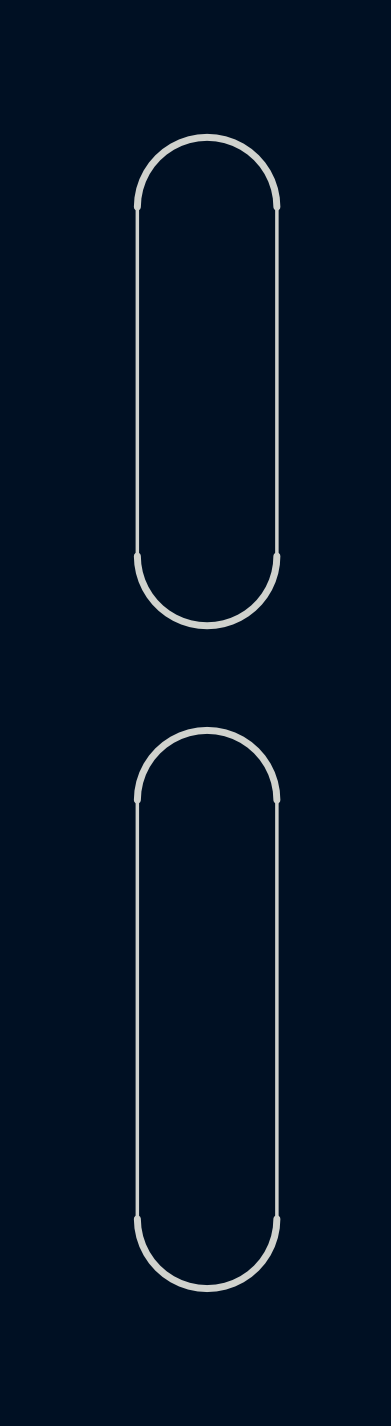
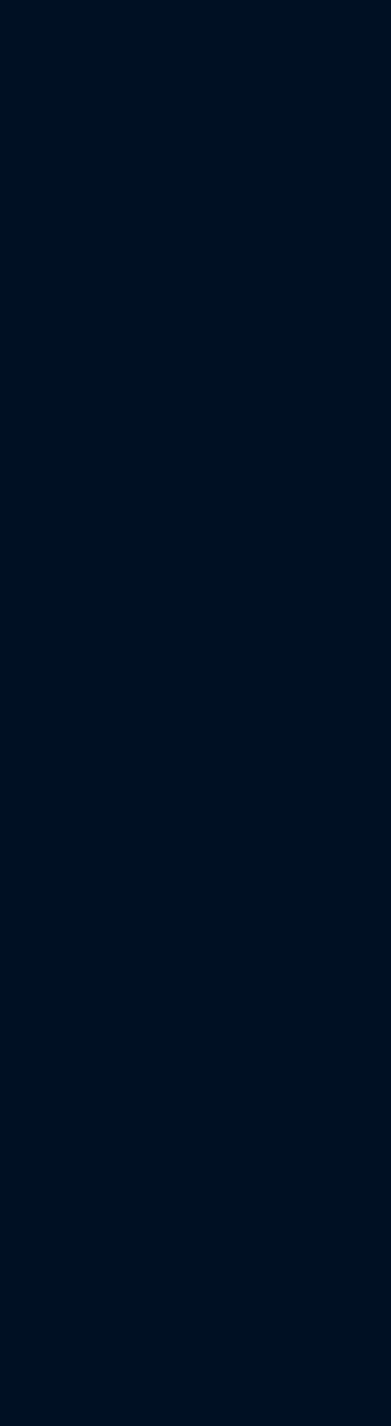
board edge: (137, 207) (137, 555) (139, 572) (149, 595) (160, 608) (174, 617) (198, 625) (223, 623) (239, 617) (259, 602) (272, 580) (276, 564) (276, 207) (274, 189) (262, 164) (242, 146) (225, 139) (198, 137) (172, 146) (157, 157) (142, 180) (137, 207) -> none
board edge: (137, 800) (137, 1227) (146, 1253) (164, 1274) (189, 1286) (216, 1287) (233, 1283) (256, 1268) (271, 1245) (276, 1227) (276, 791) (271, 773) (256, 750) (233, 735) (207, 730) (180, 735) (157, 750) (142, 773) (137, 800) -> none

